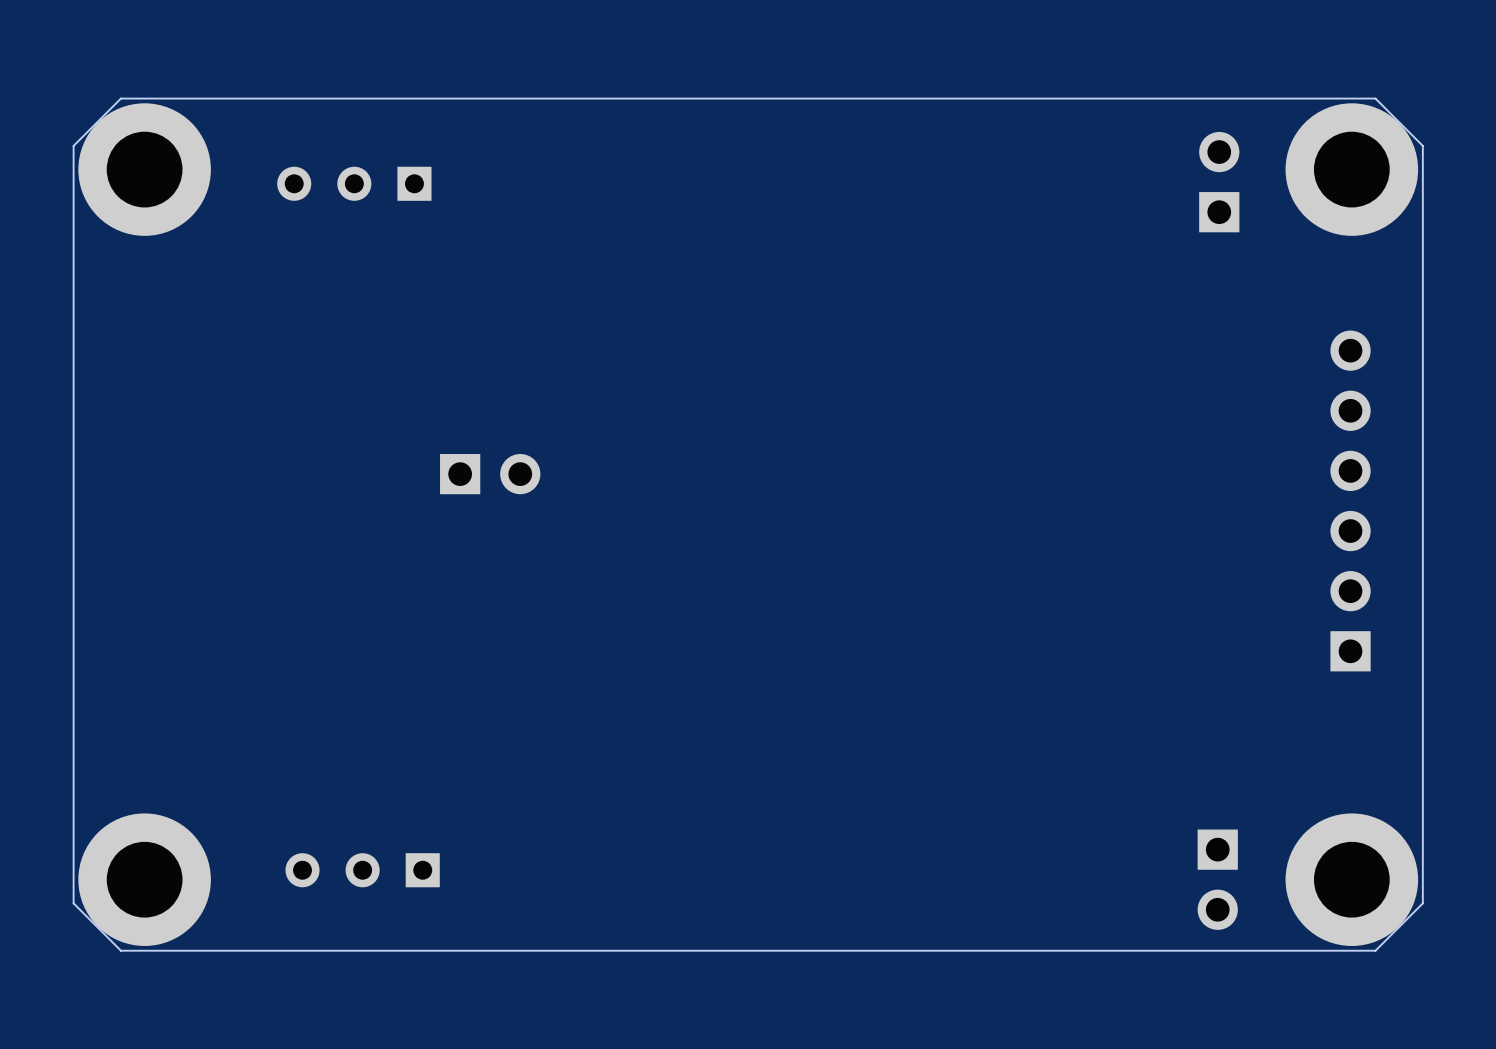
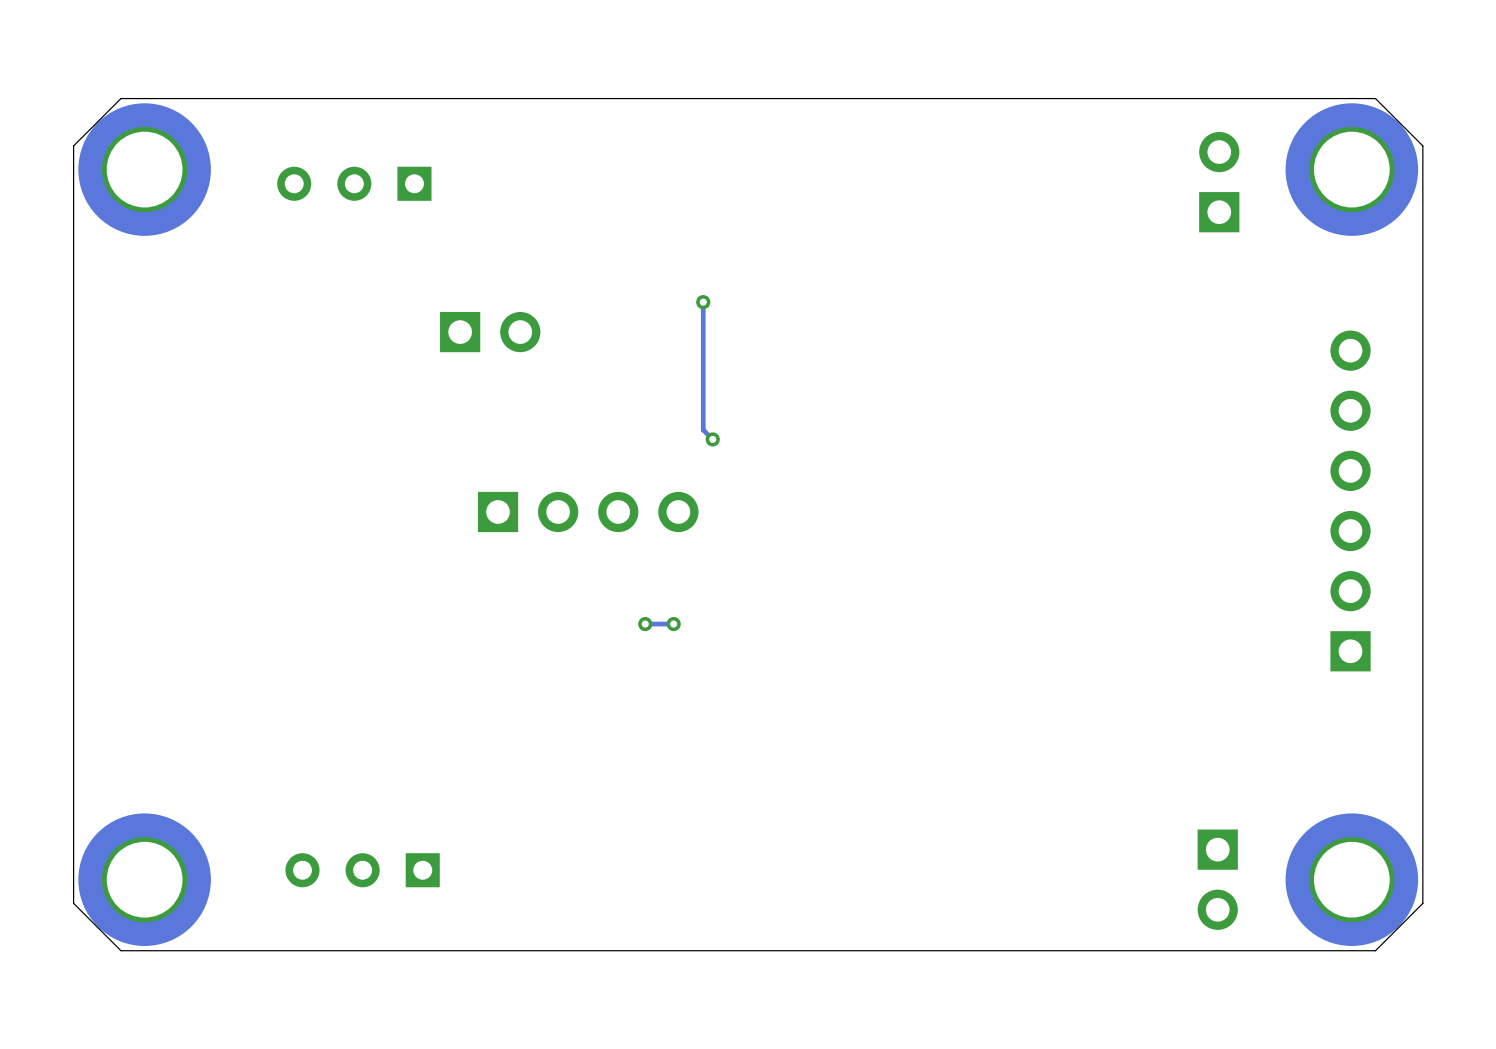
track: none -> (703, 302) (703, 429) (712, 439)
via: none -> (703, 302)
via: none -> (712, 439)
part position: (490, 474) -> (490, 332)
part: none -> (588, 511)
via: none -> (645, 624)
track: none -> (673, 624) (645, 624)
via: none -> (673, 624)

